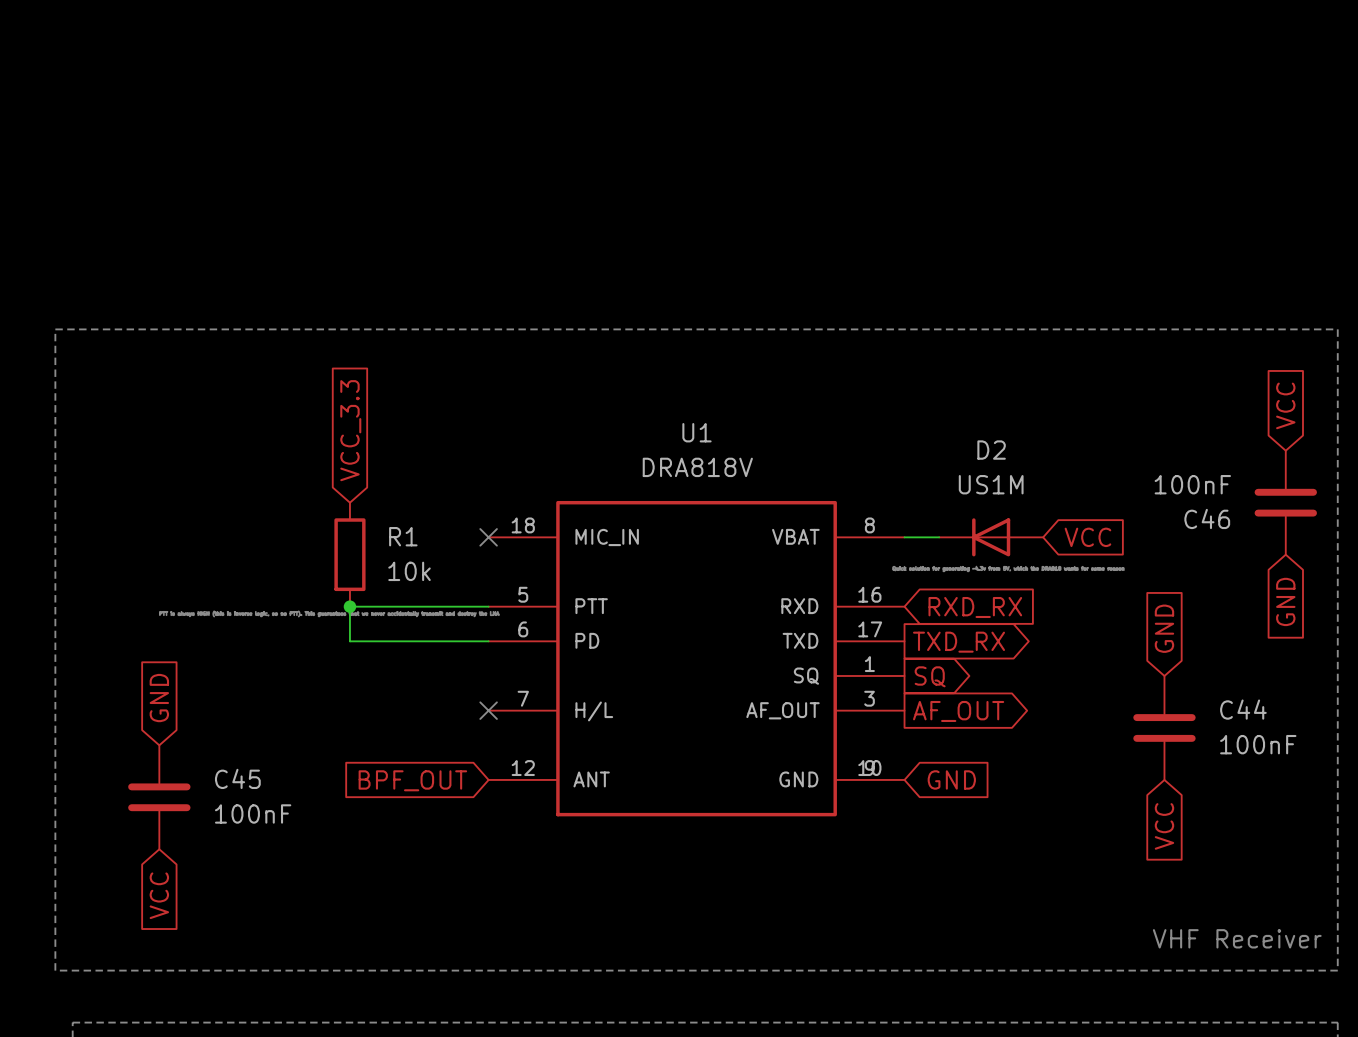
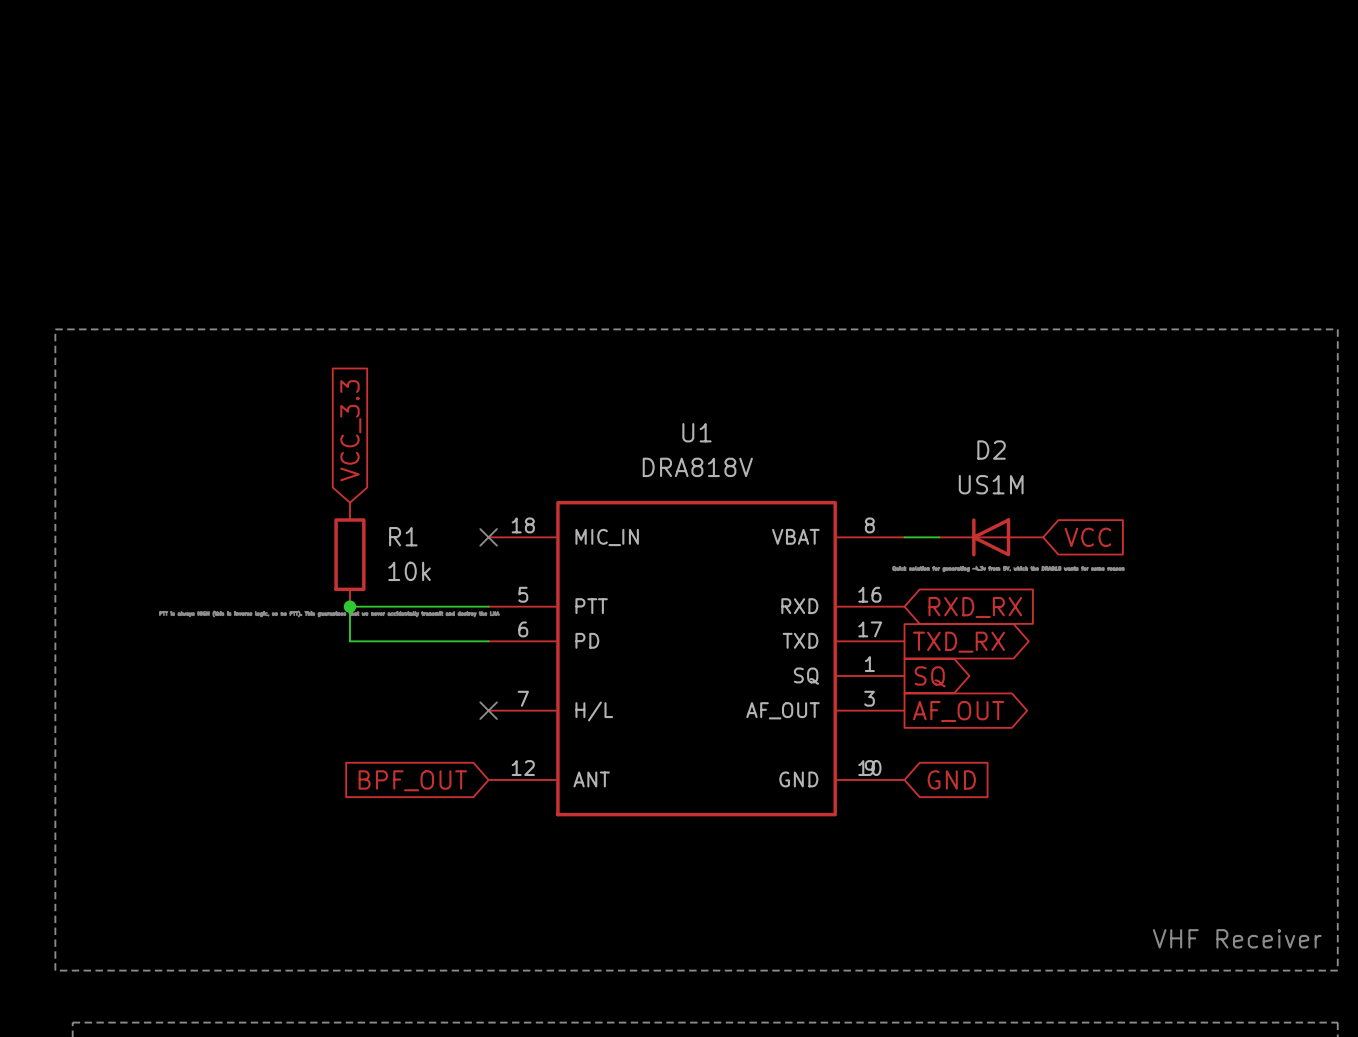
global label: VCC (1285, 405) -> none
C46: 100nF (1285, 502) -> none
global label: GND (1285, 601) -> none
global label: GND (1164, 628) -> none
global label: GND (159, 698) -> none
C44: 100nF (1164, 727) -> none
C45: 100nF (159, 797) -> none
global label: VCC (1164, 826) -> none
global label: VCC (159, 895) -> none

